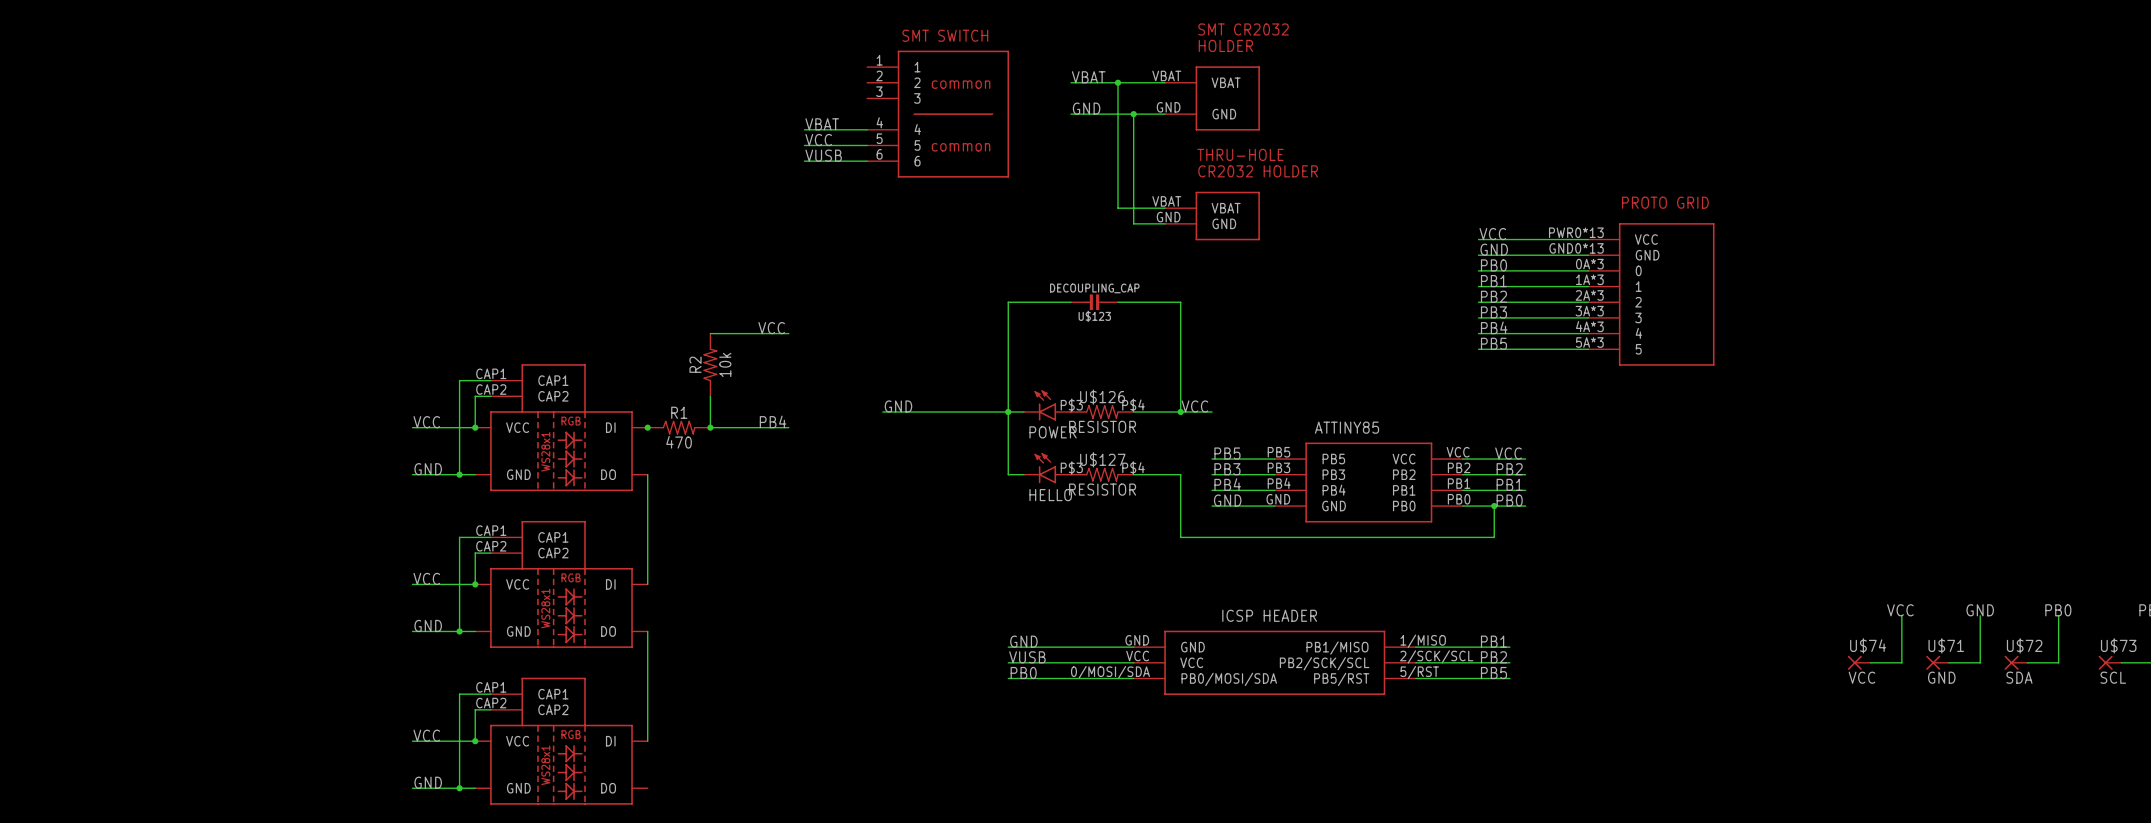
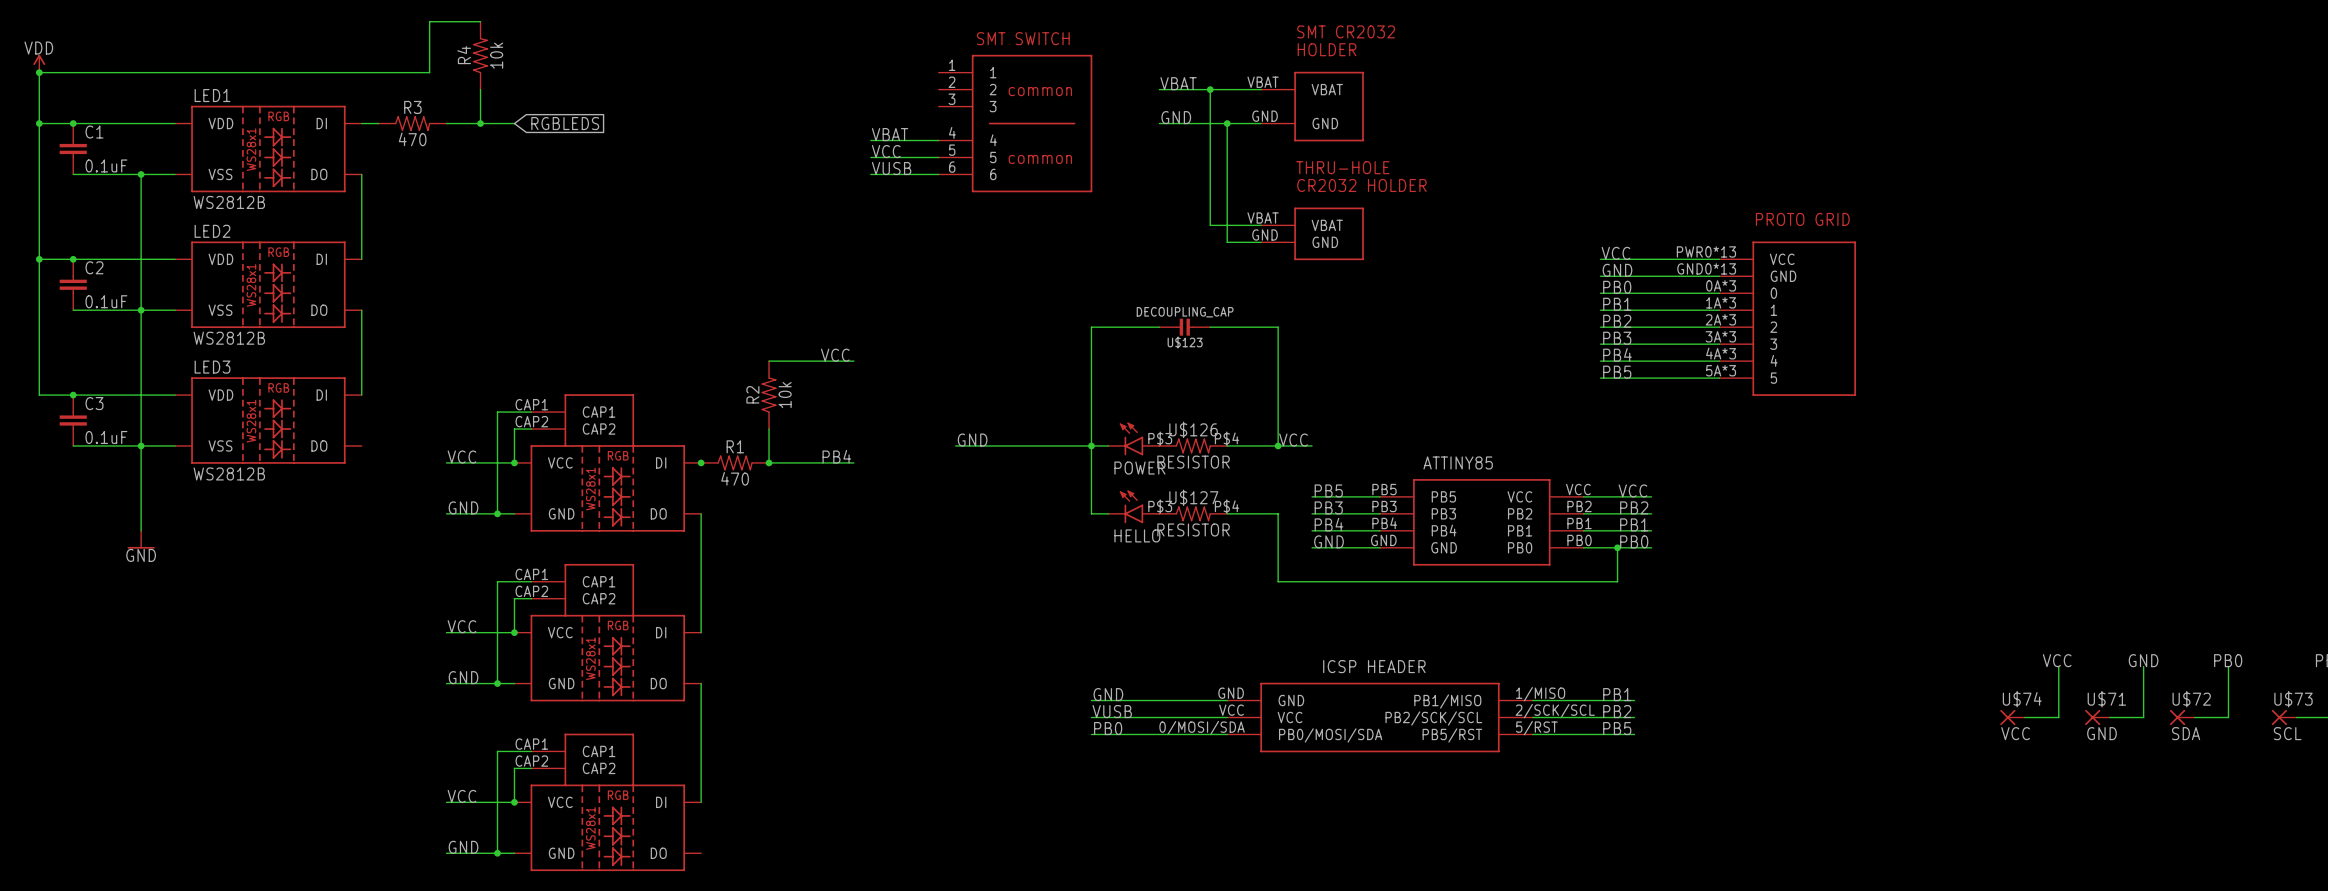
wire: none -> (480, 21) (429, 21) (429, 72) (39, 72) (39, 395) (175, 395)
R4: none -> 10k (480, 55)
power symbol: none -> VDD (39, 63)
junction: none -> (39, 72)
wire: none -> (480, 89) (480, 123)
wire: none -> (39, 123) (175, 123)
junction: none -> (39, 123)
junction: none -> (73, 123)
wire: none -> (361, 123) (378, 123)
R3: none -> 470 (412, 123)
wire: none -> (446, 123) (514, 123)
junction: none -> (480, 123)
global label: none -> RGBLEDS (565, 123)
C1: none -> 0.1uF (73, 149)
LED1: none -> WS2812B (268, 149)
wire: none -> (73, 174) (175, 174)
wire: none -> (141, 174) (141, 530)
junction: none -> (141, 174)
wire: none -> (361, 174) (361, 259)
wire: none -> (39, 259) (175, 259)
junction: none -> (39, 259)
junction: none -> (73, 259)
C2: none -> 0.1uF (73, 284)
LED2: none -> WS2812B (268, 284)
wire: none -> (73, 310) (175, 310)
junction: none -> (141, 310)
wire: none -> (361, 310) (361, 395)
junction: none -> (73, 395)
C3: none -> 0.1uF (73, 420)
LED3: none -> WS2812B (268, 420)
wire: none -> (73, 445) (175, 445)
junction: none -> (141, 445)
power symbol: none -> GND (141, 539)

